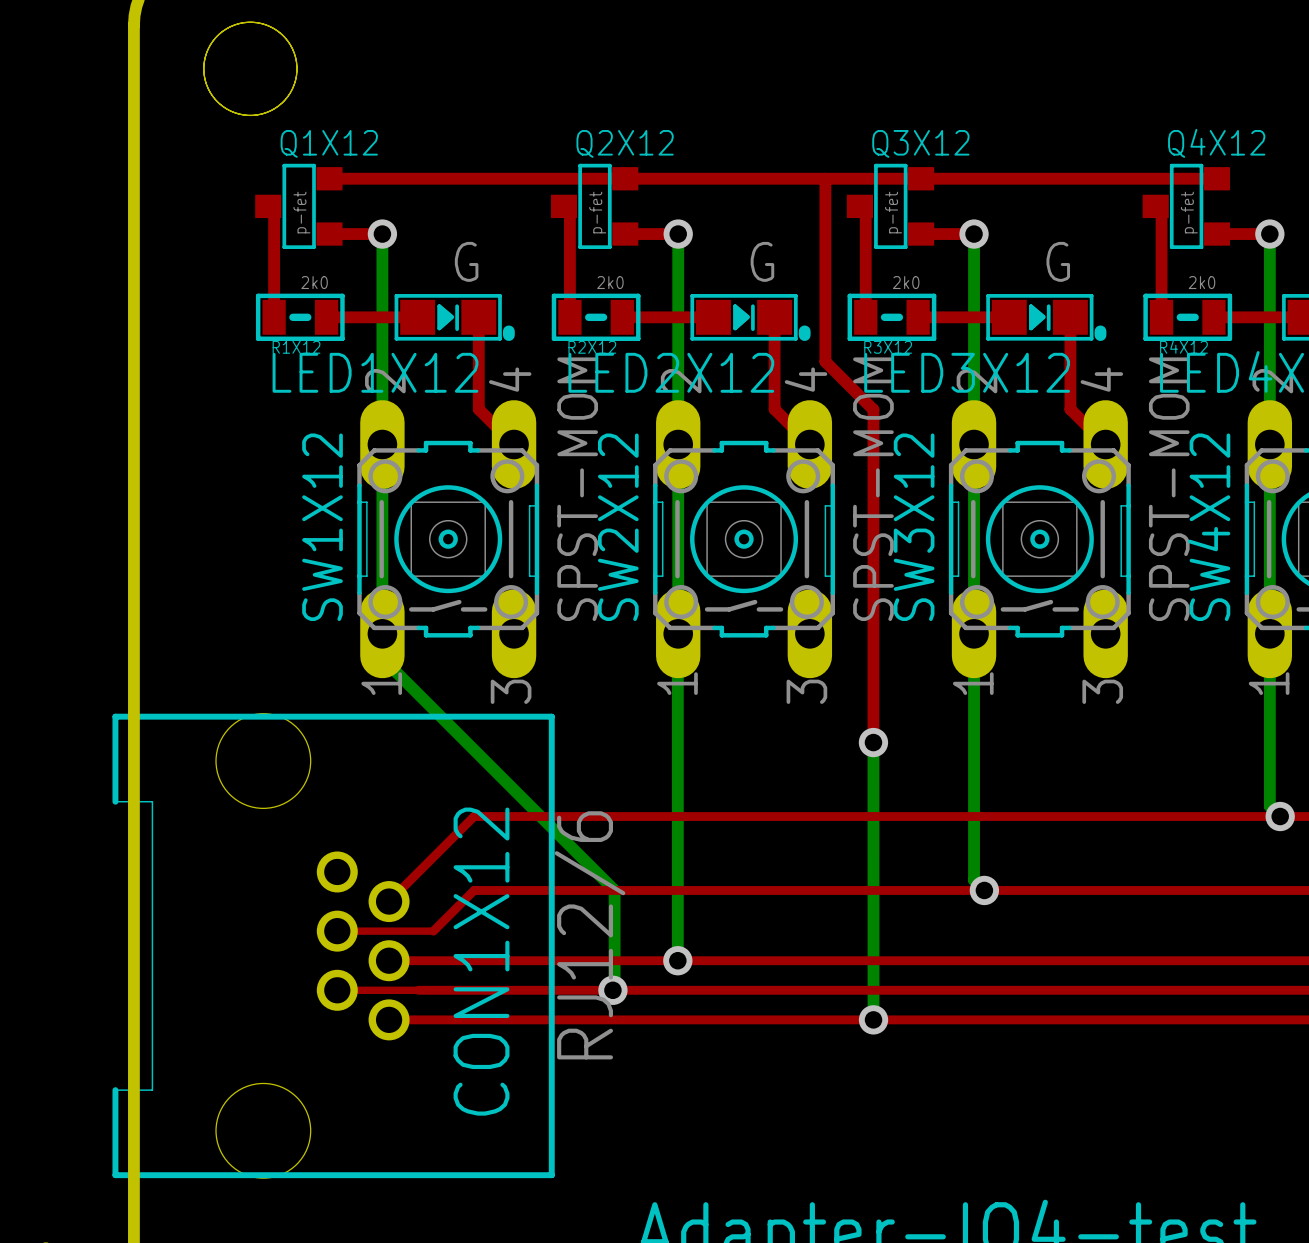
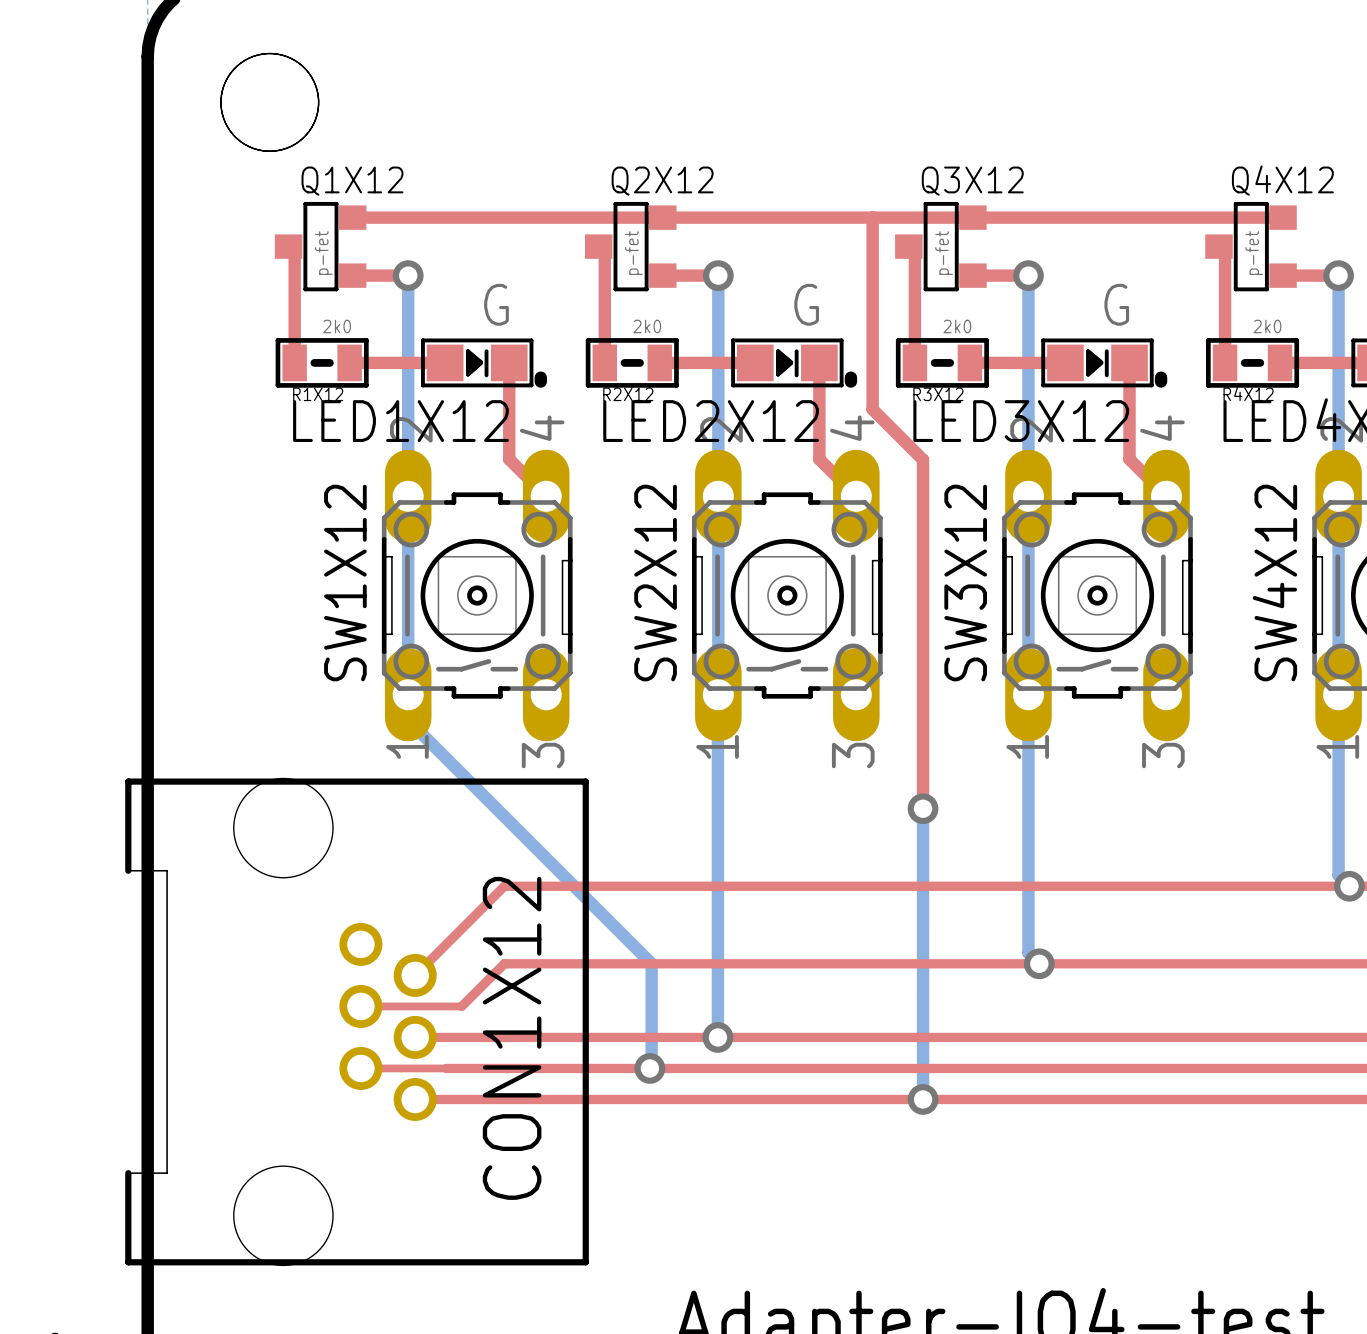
SW1X12 value: SPST-MOM (577, 489) -> none
SW2X12 value: SPST-MOM (873, 489) -> none
SW3X12 value: SPST-MOM (1169, 489) -> none
CON1X12 value: RJ12/6 (589, 935) -> none

